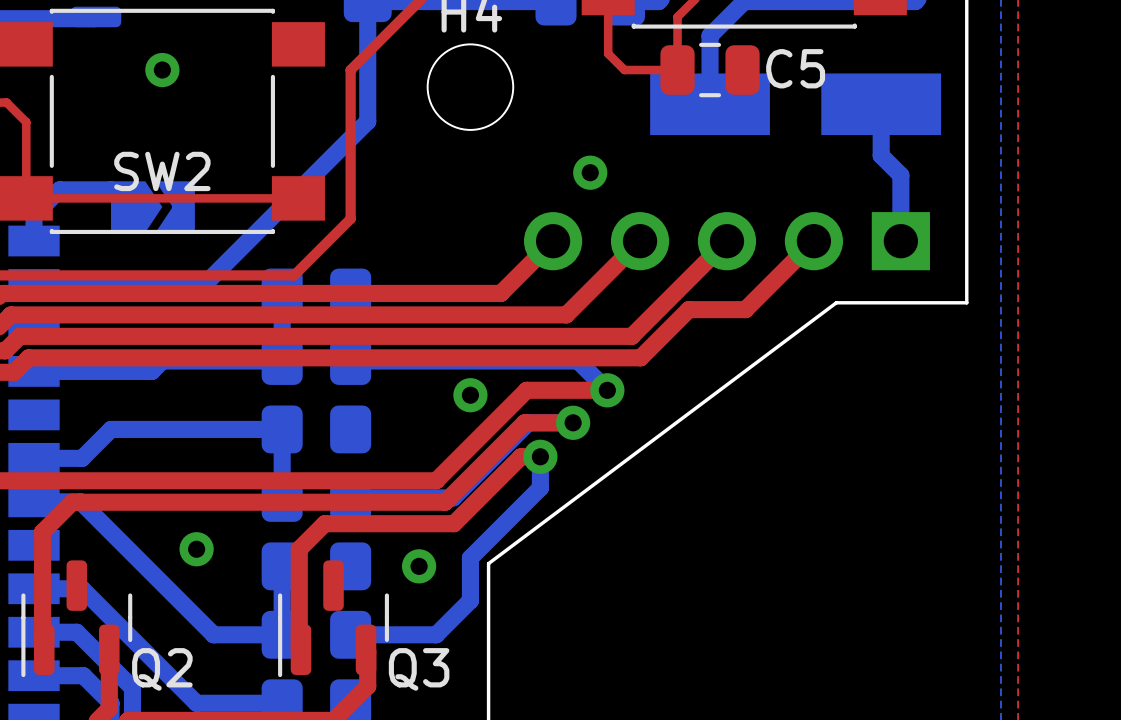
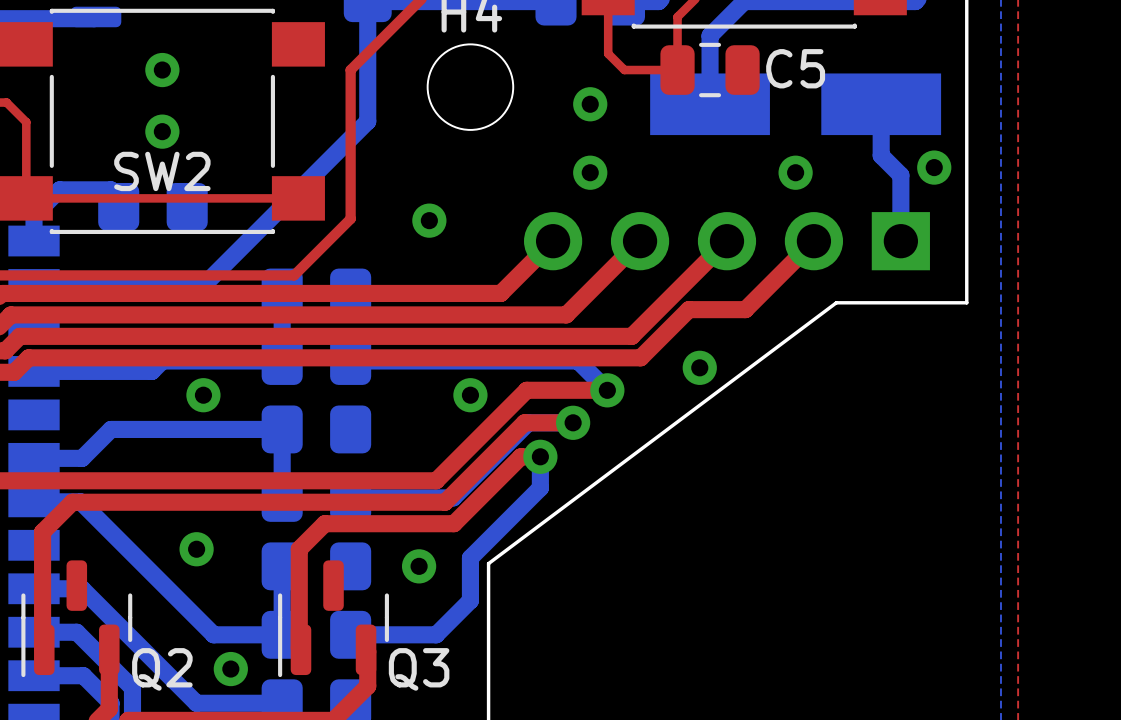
via: none -> (590, 104)
via: none -> (162, 131)
via: none -> (934, 167)
via: none -> (795, 172)
part footprint: [111, 181, 195, 233] -> [98, 182, 208, 231]
via: none -> (429, 220)
via: none -> (699, 367)
via: none -> (203, 395)
via: none -> (230, 669)

